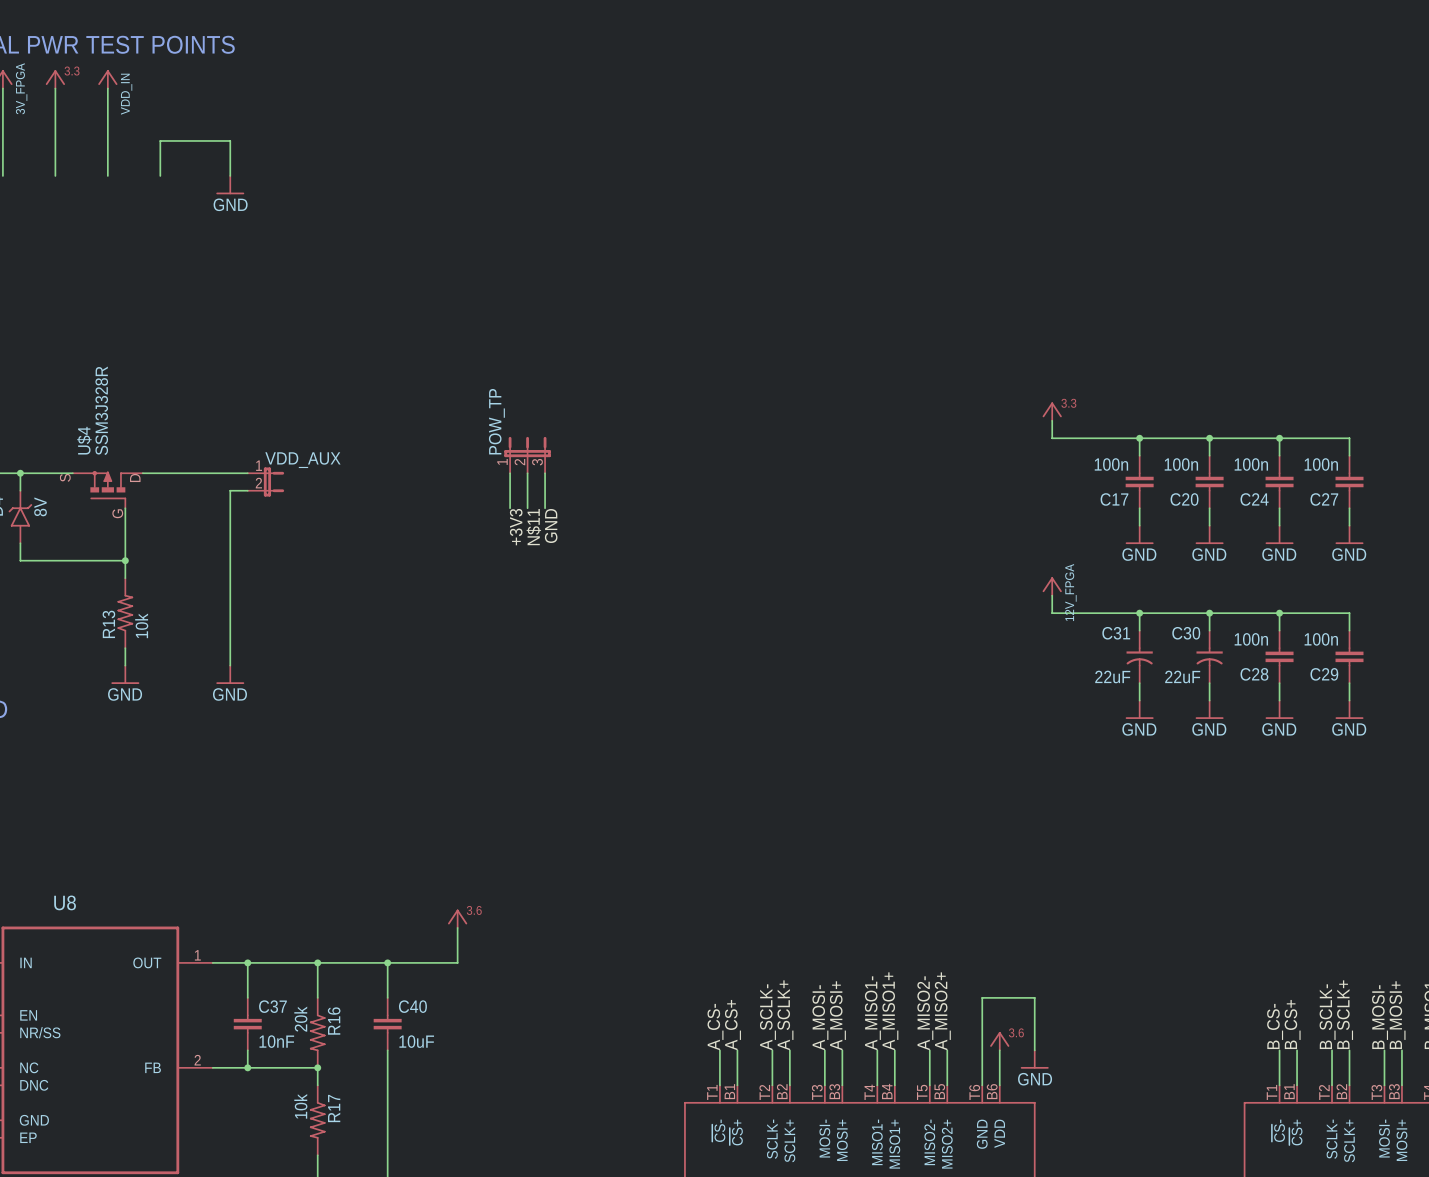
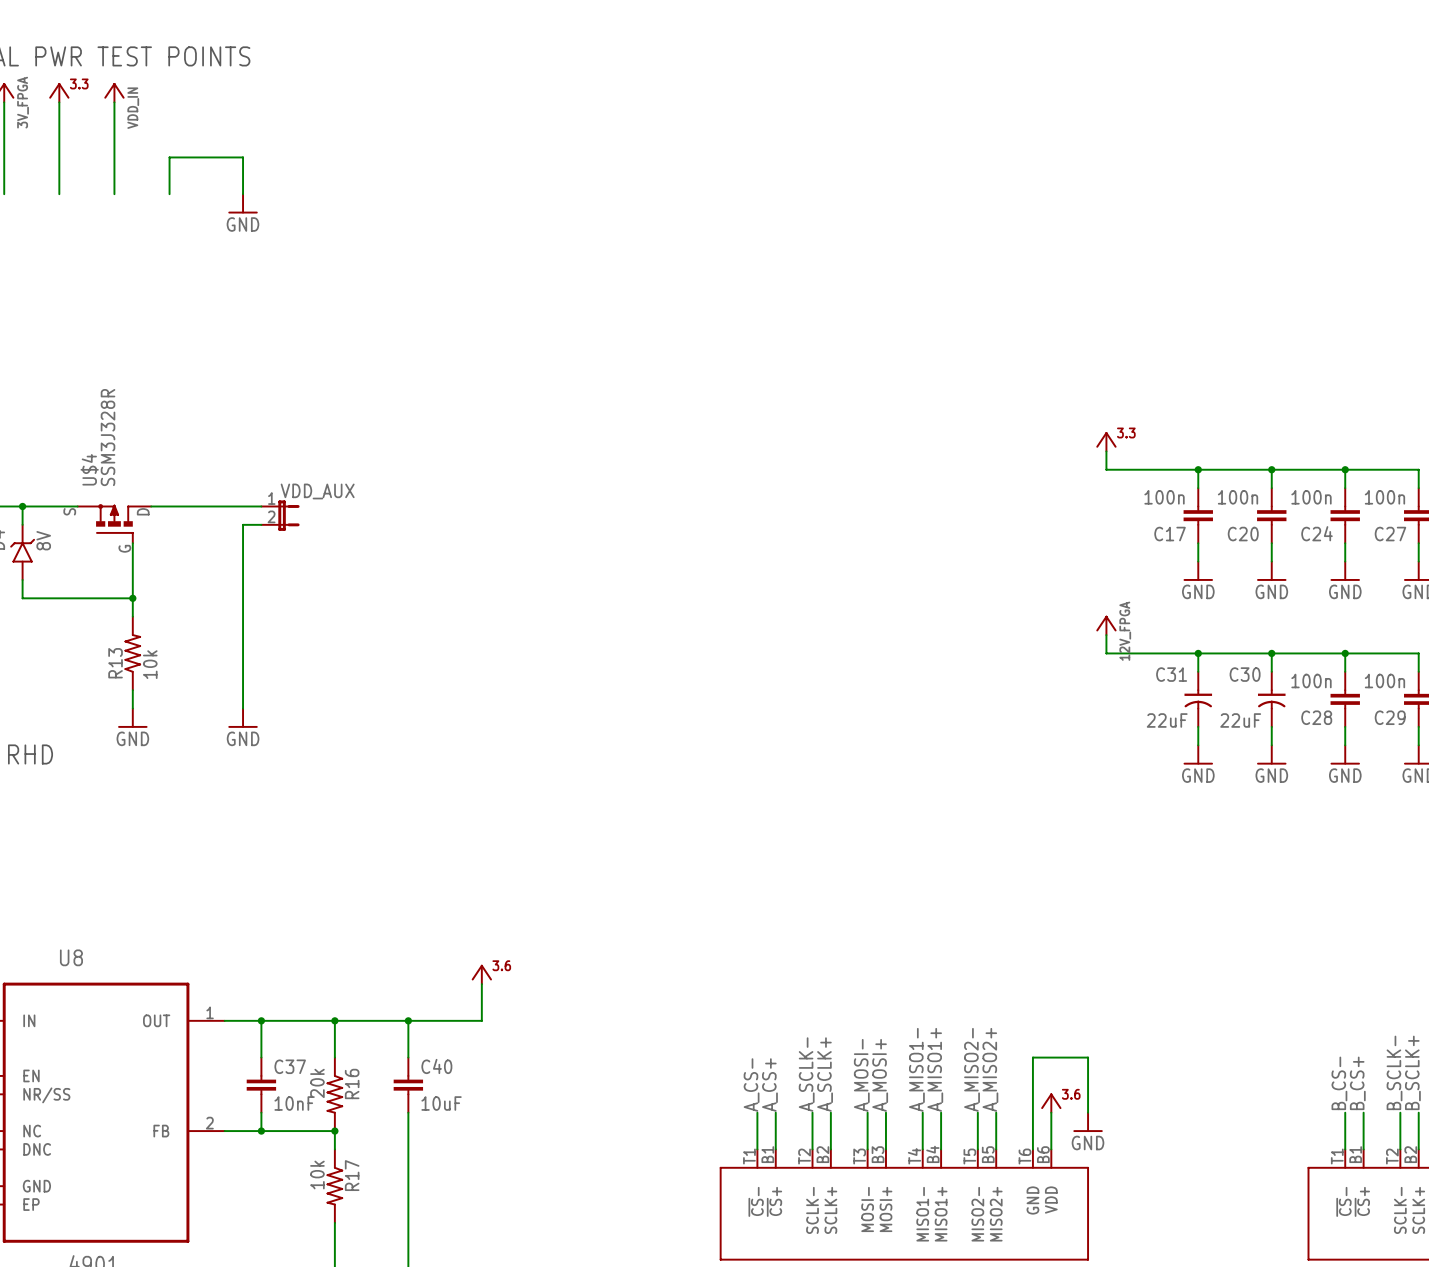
POW_TP: (527, 455) -> none
wire: (510, 473) (510, 508) -> none
wire: (527, 473) (527, 508) -> none
wire: (545, 473) (545, 508) -> none
label: GND (551, 526) -> none
label: +3V3 (516, 527) -> none
label: N$11 (533, 527) -> none

